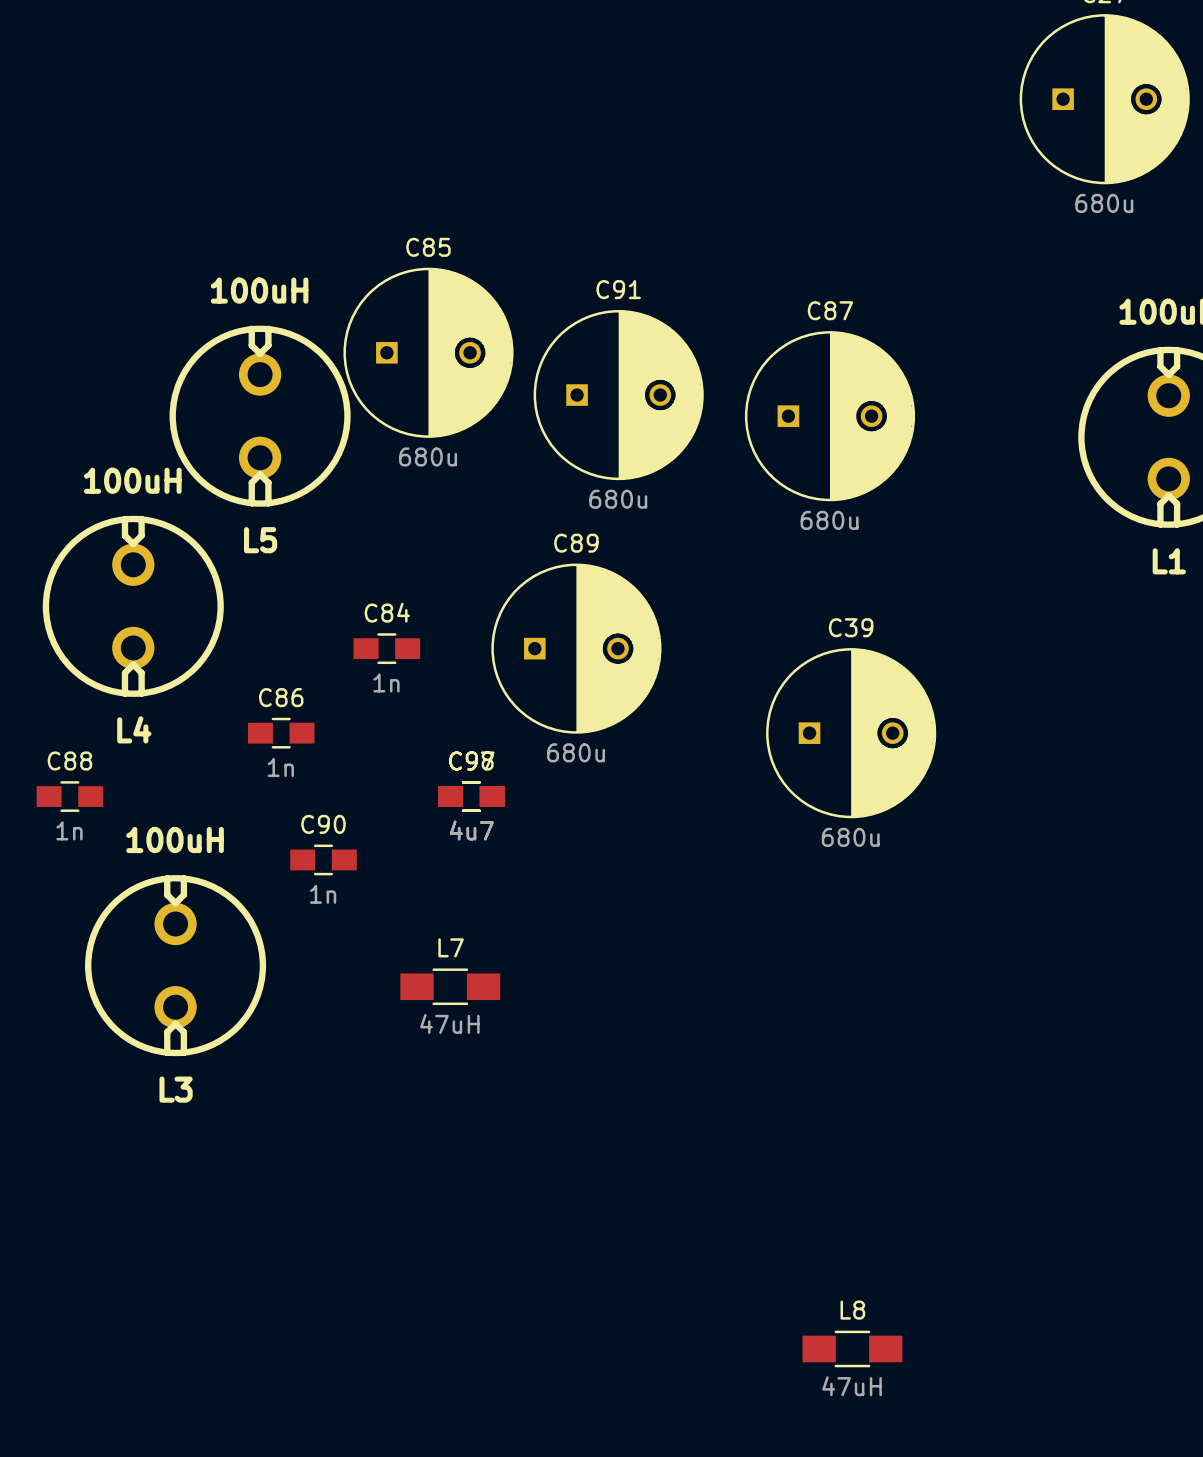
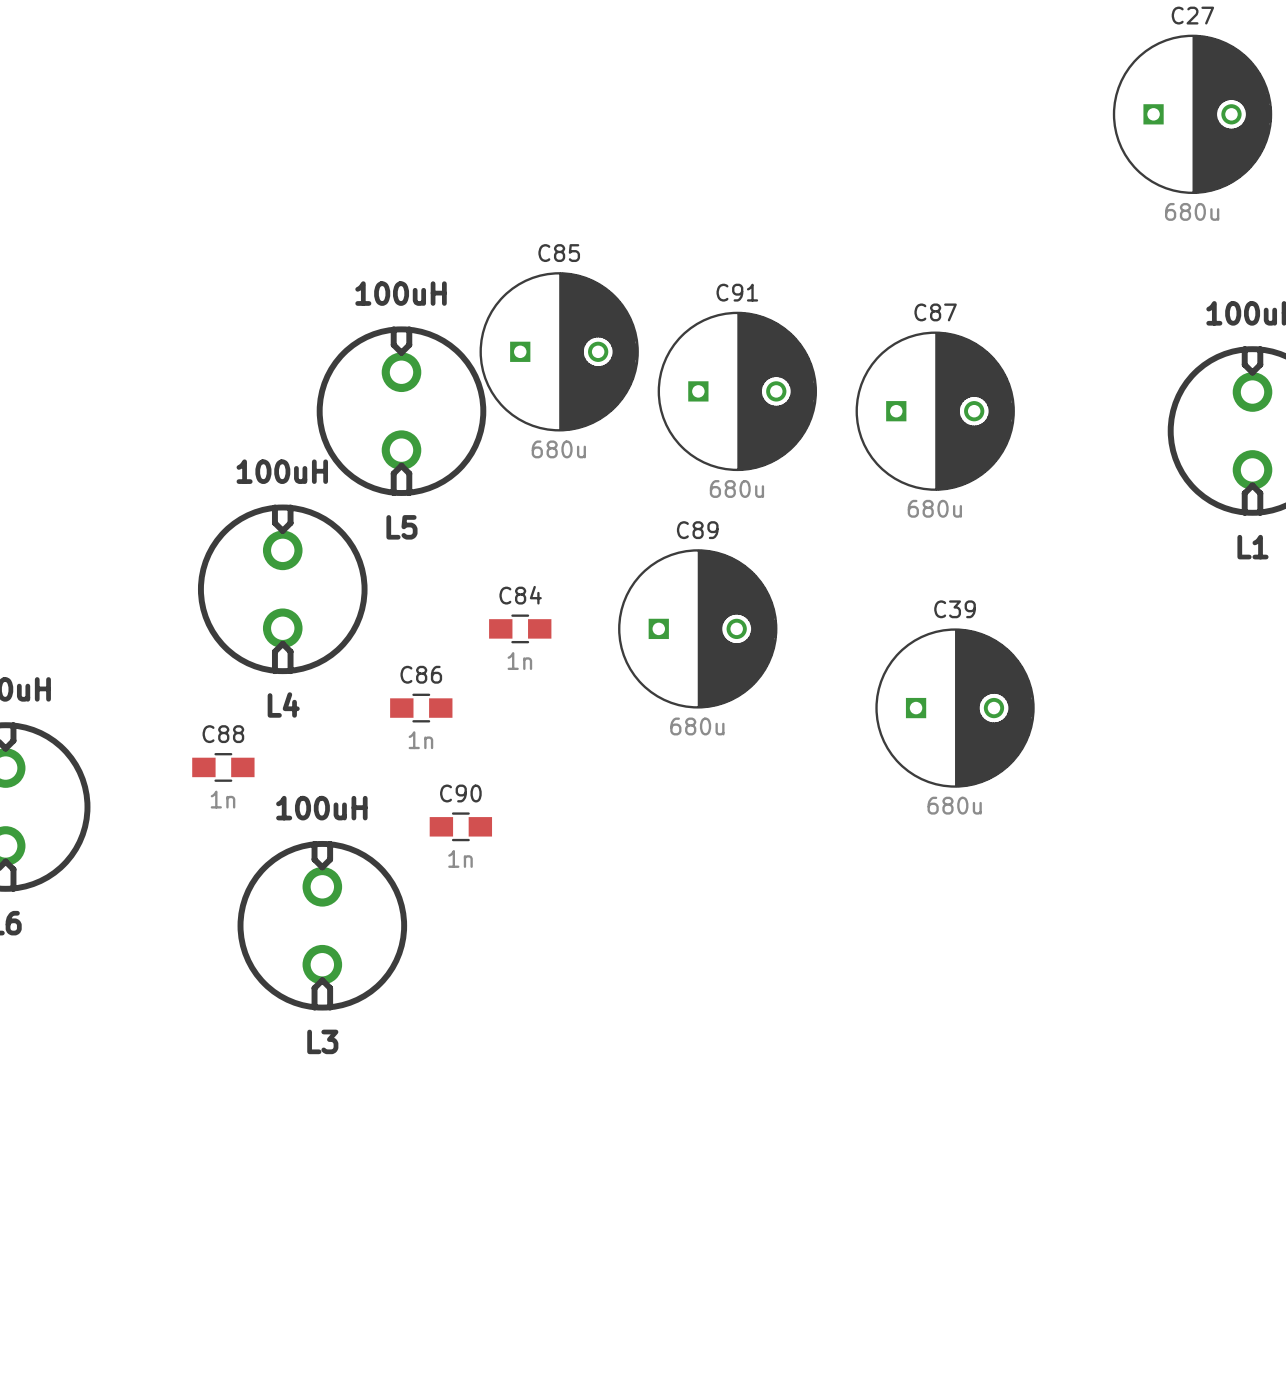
part: 4u7 (471, 796) -> none
part: 4u7 (471, 796) -> none
L7: 47uH (450, 986) -> none
L8: 47uH (852, 1348) -> none

